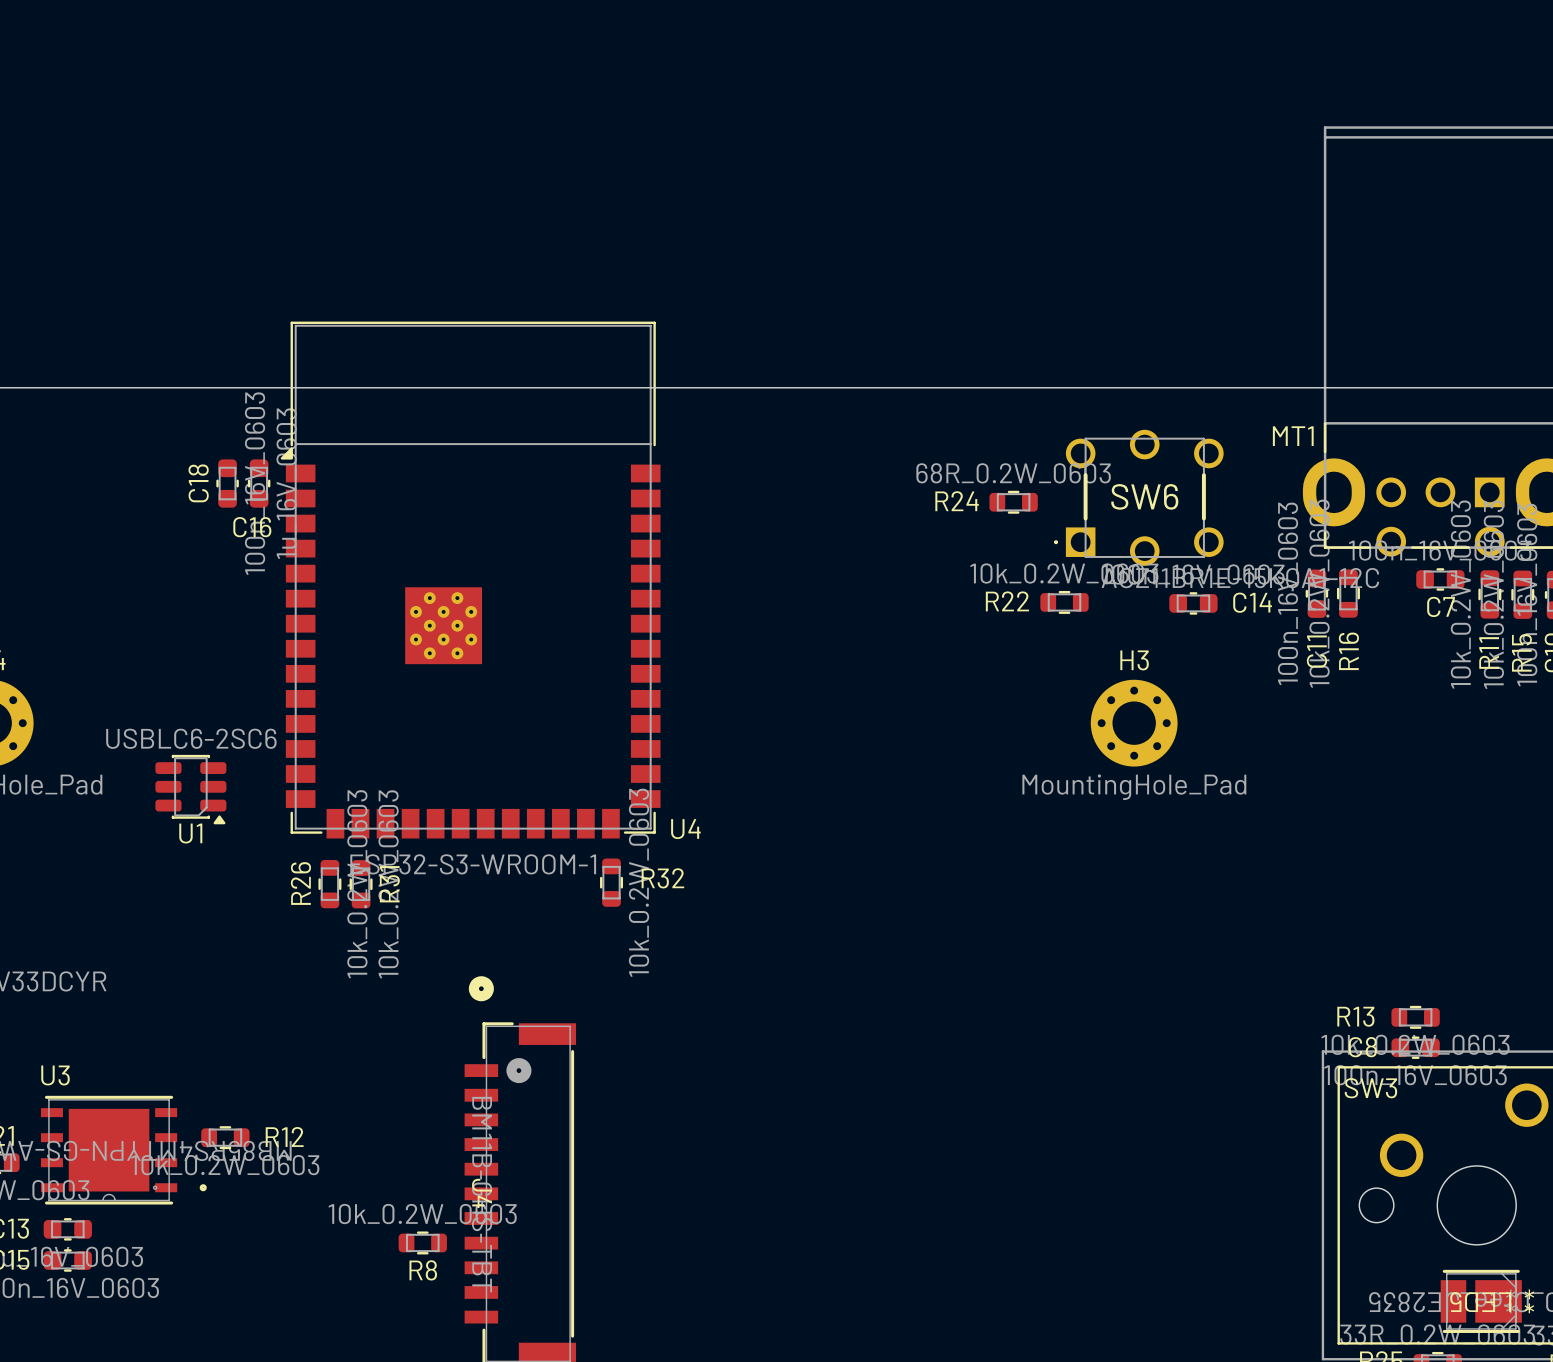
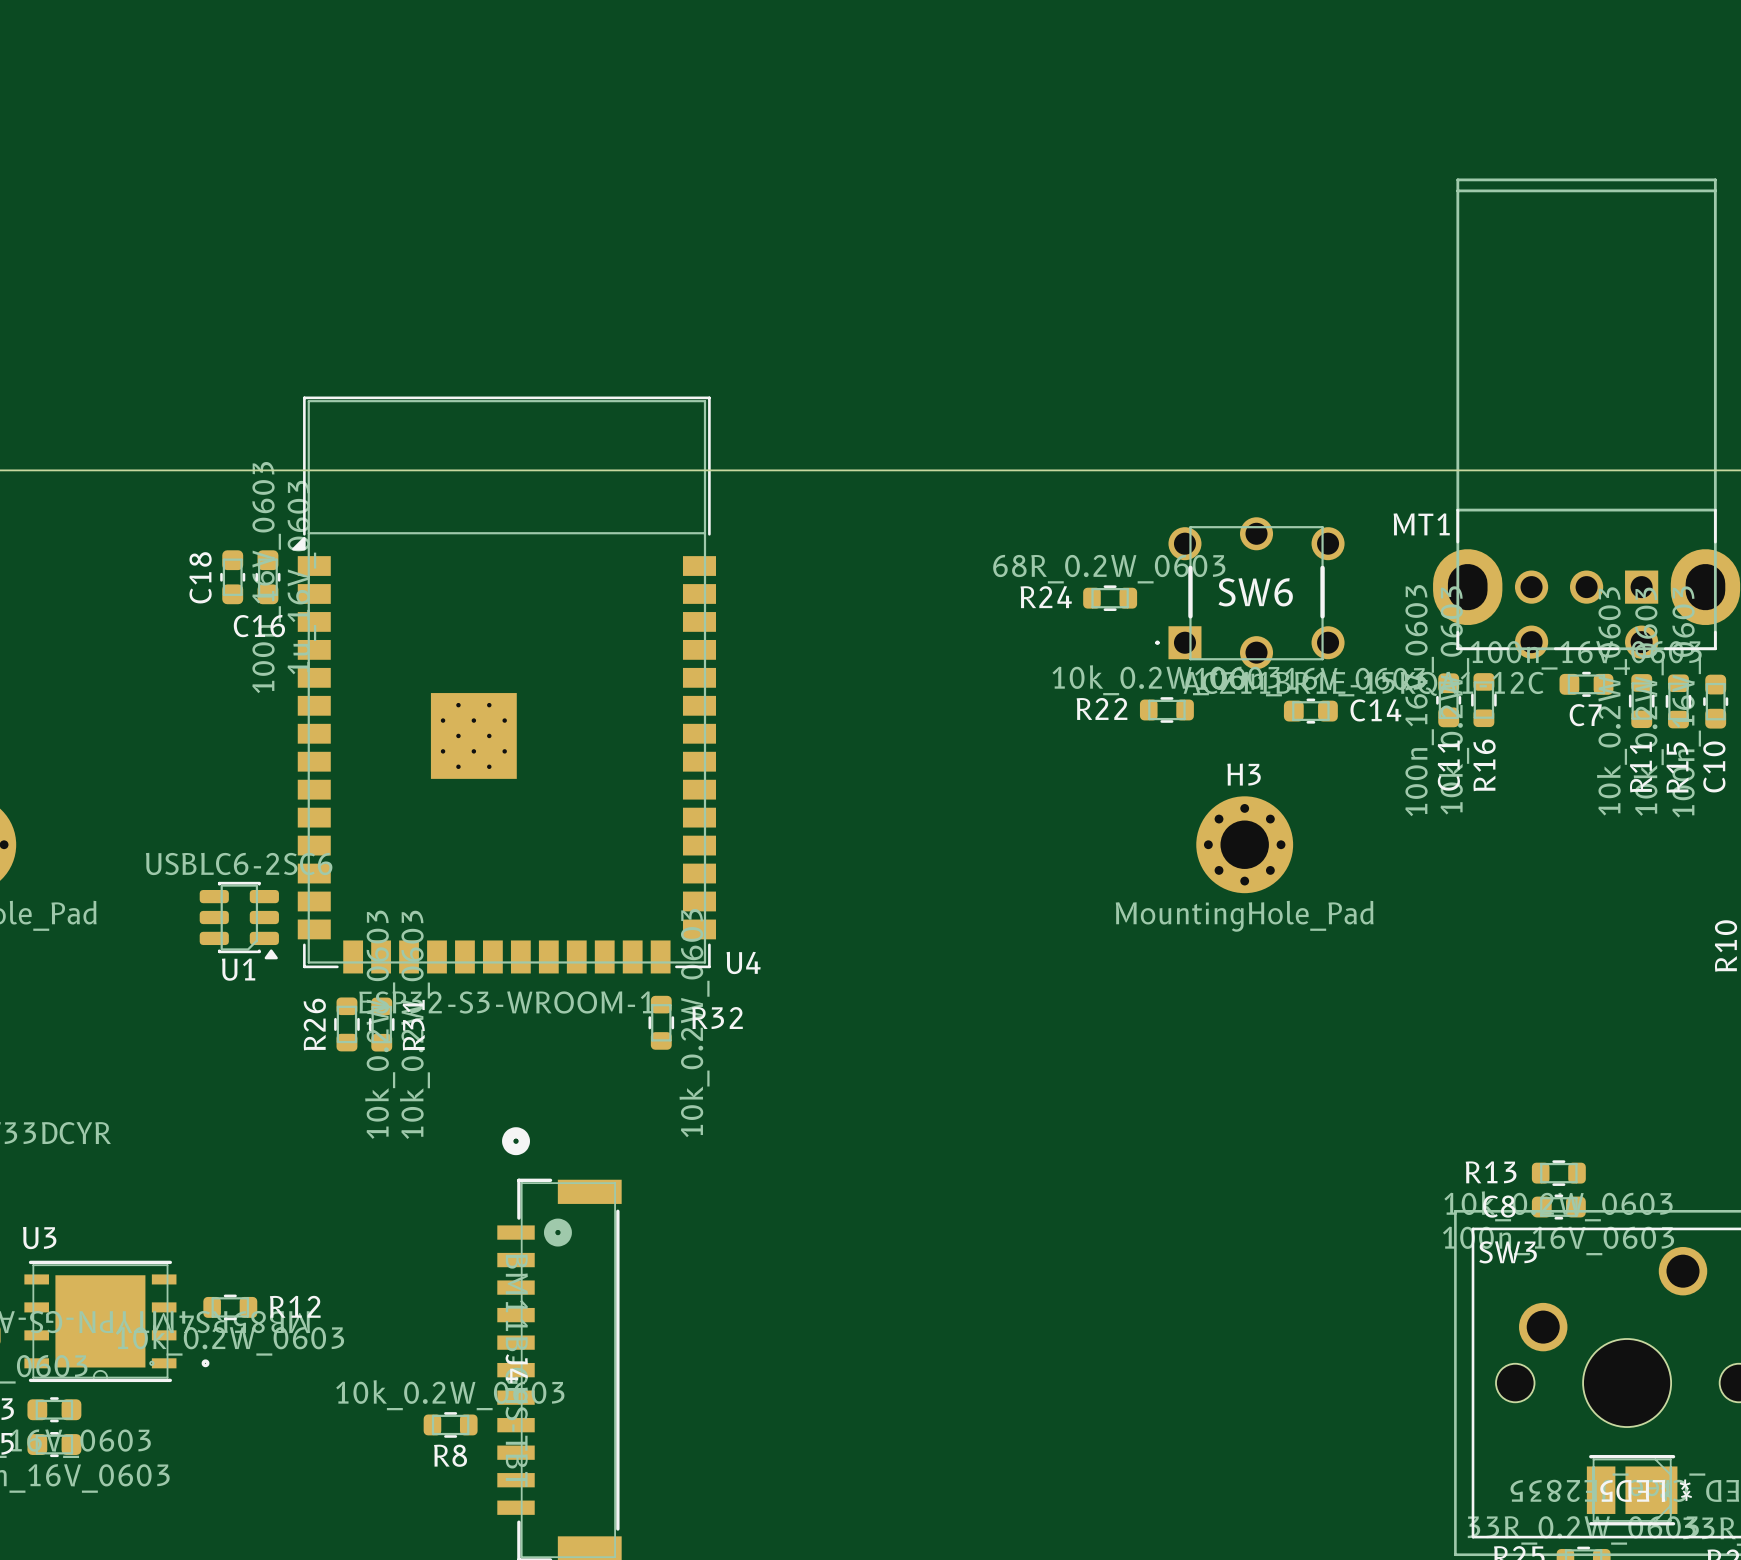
U1 position: (190, 789) -> (239, 920)

